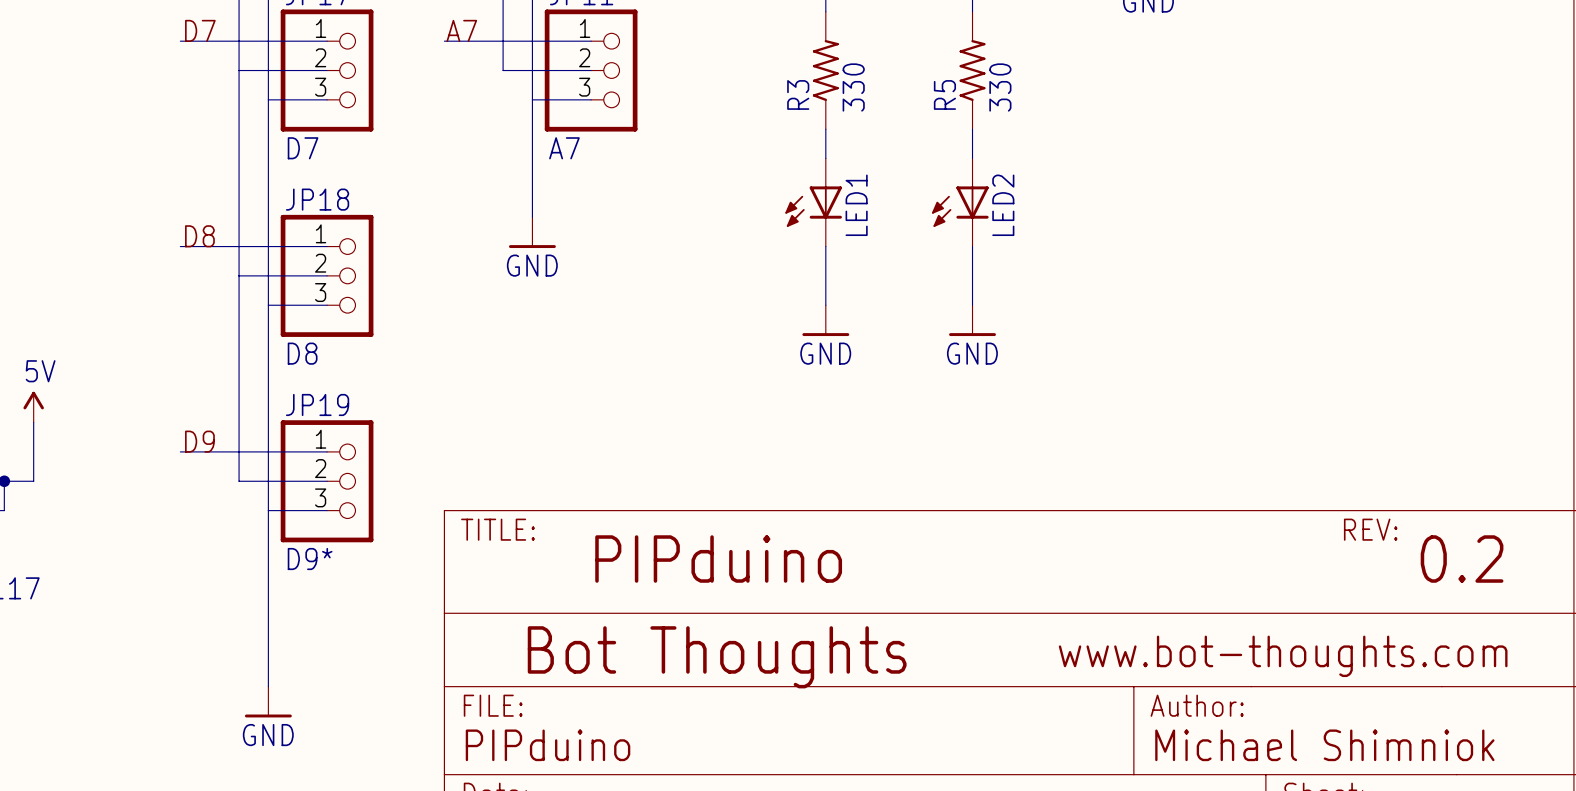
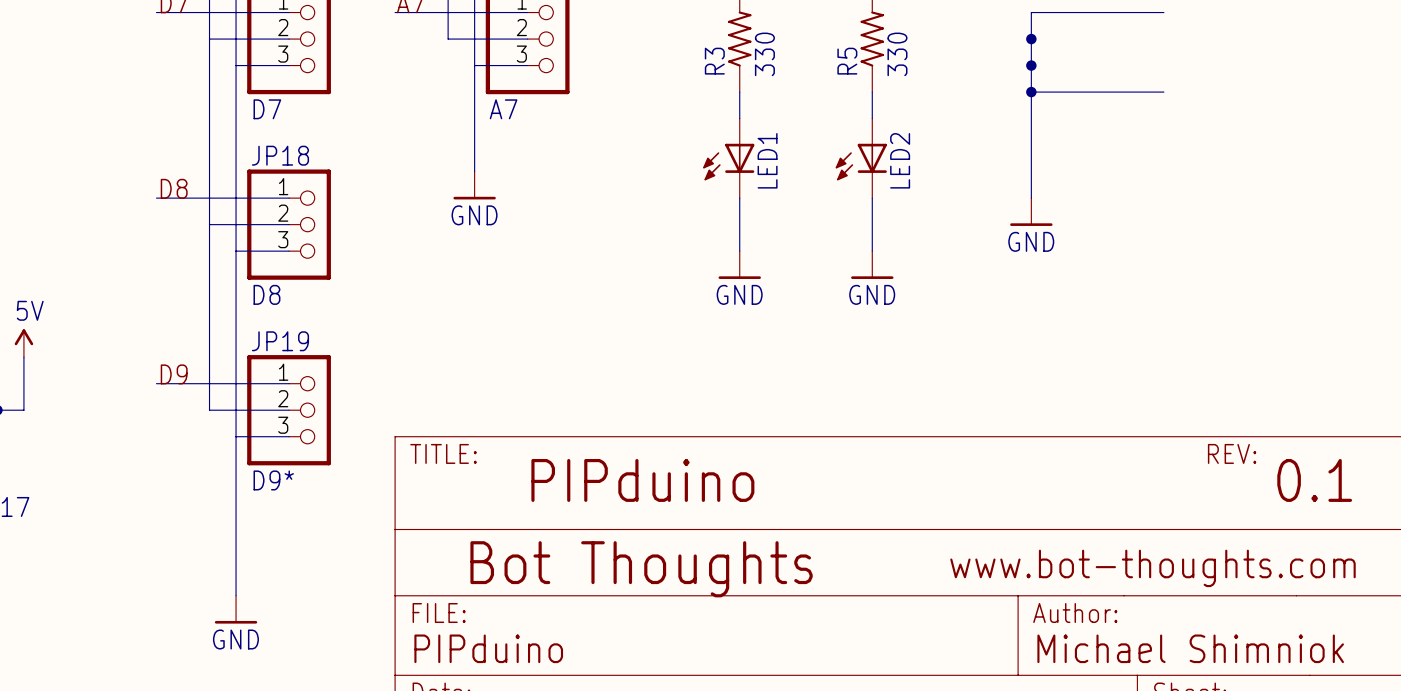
wire: none -> (1163, 12) (1031, 12) (1031, 198)
junction: none -> (1031, 39)
junction: none -> (1031, 65)
wire: none -> (1031, 92) (1163, 92)
junction: none -> (1031, 92)
power symbol: none -> GND (1031, 212)
text: 0.2 (1462, 559) -> 0.1 (1314, 480)

